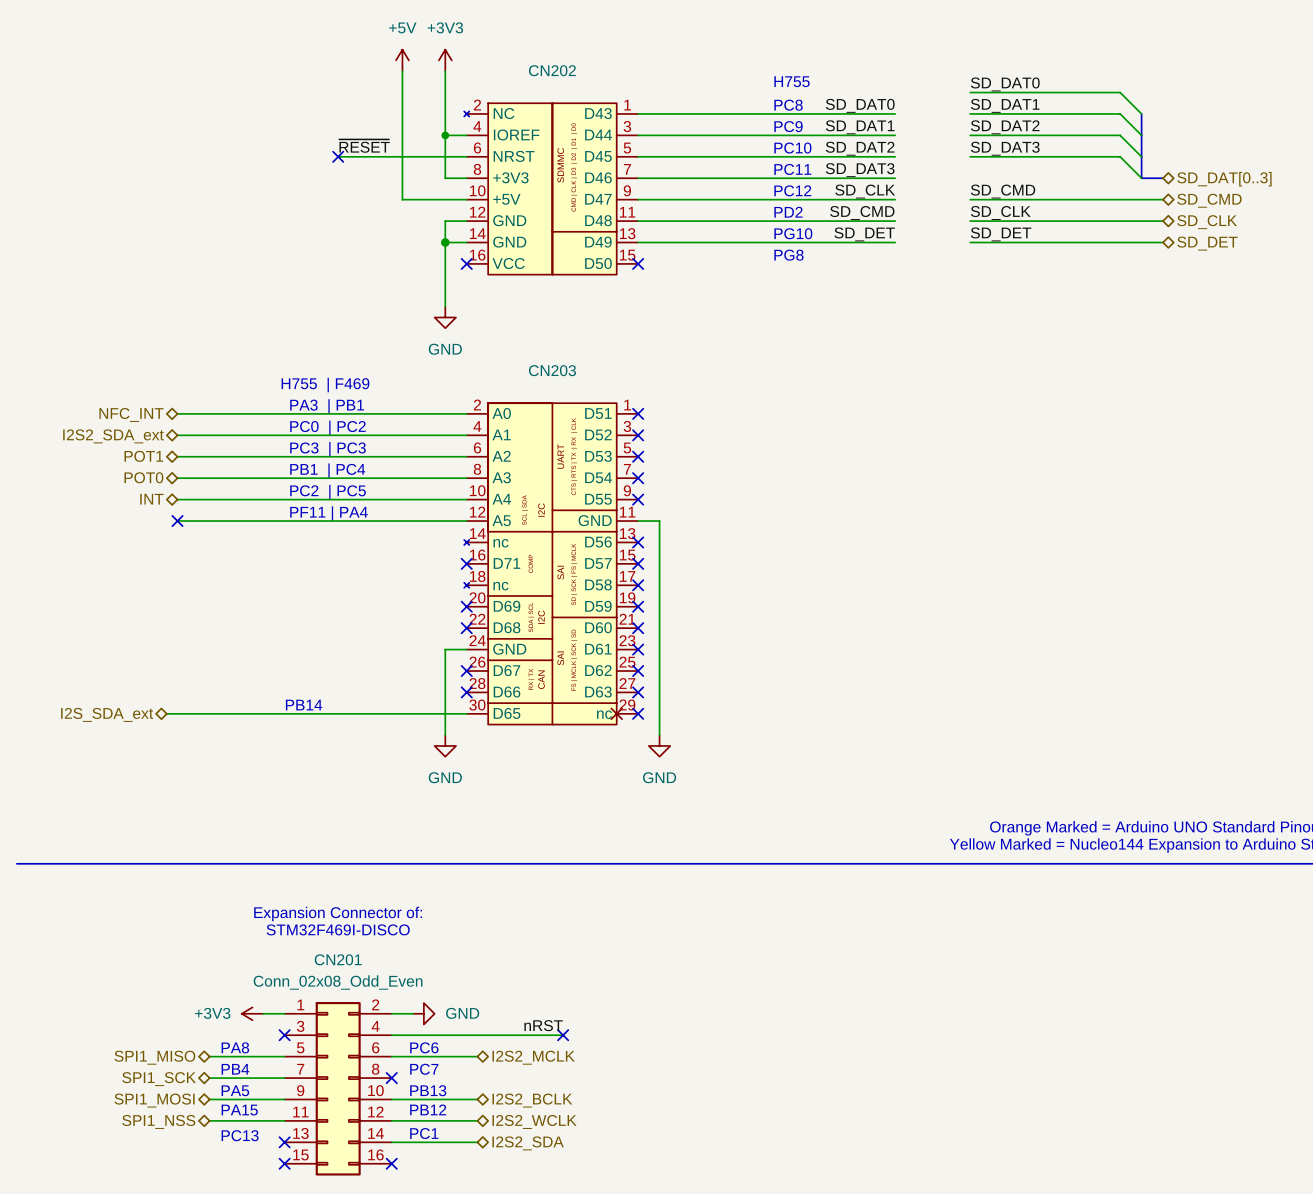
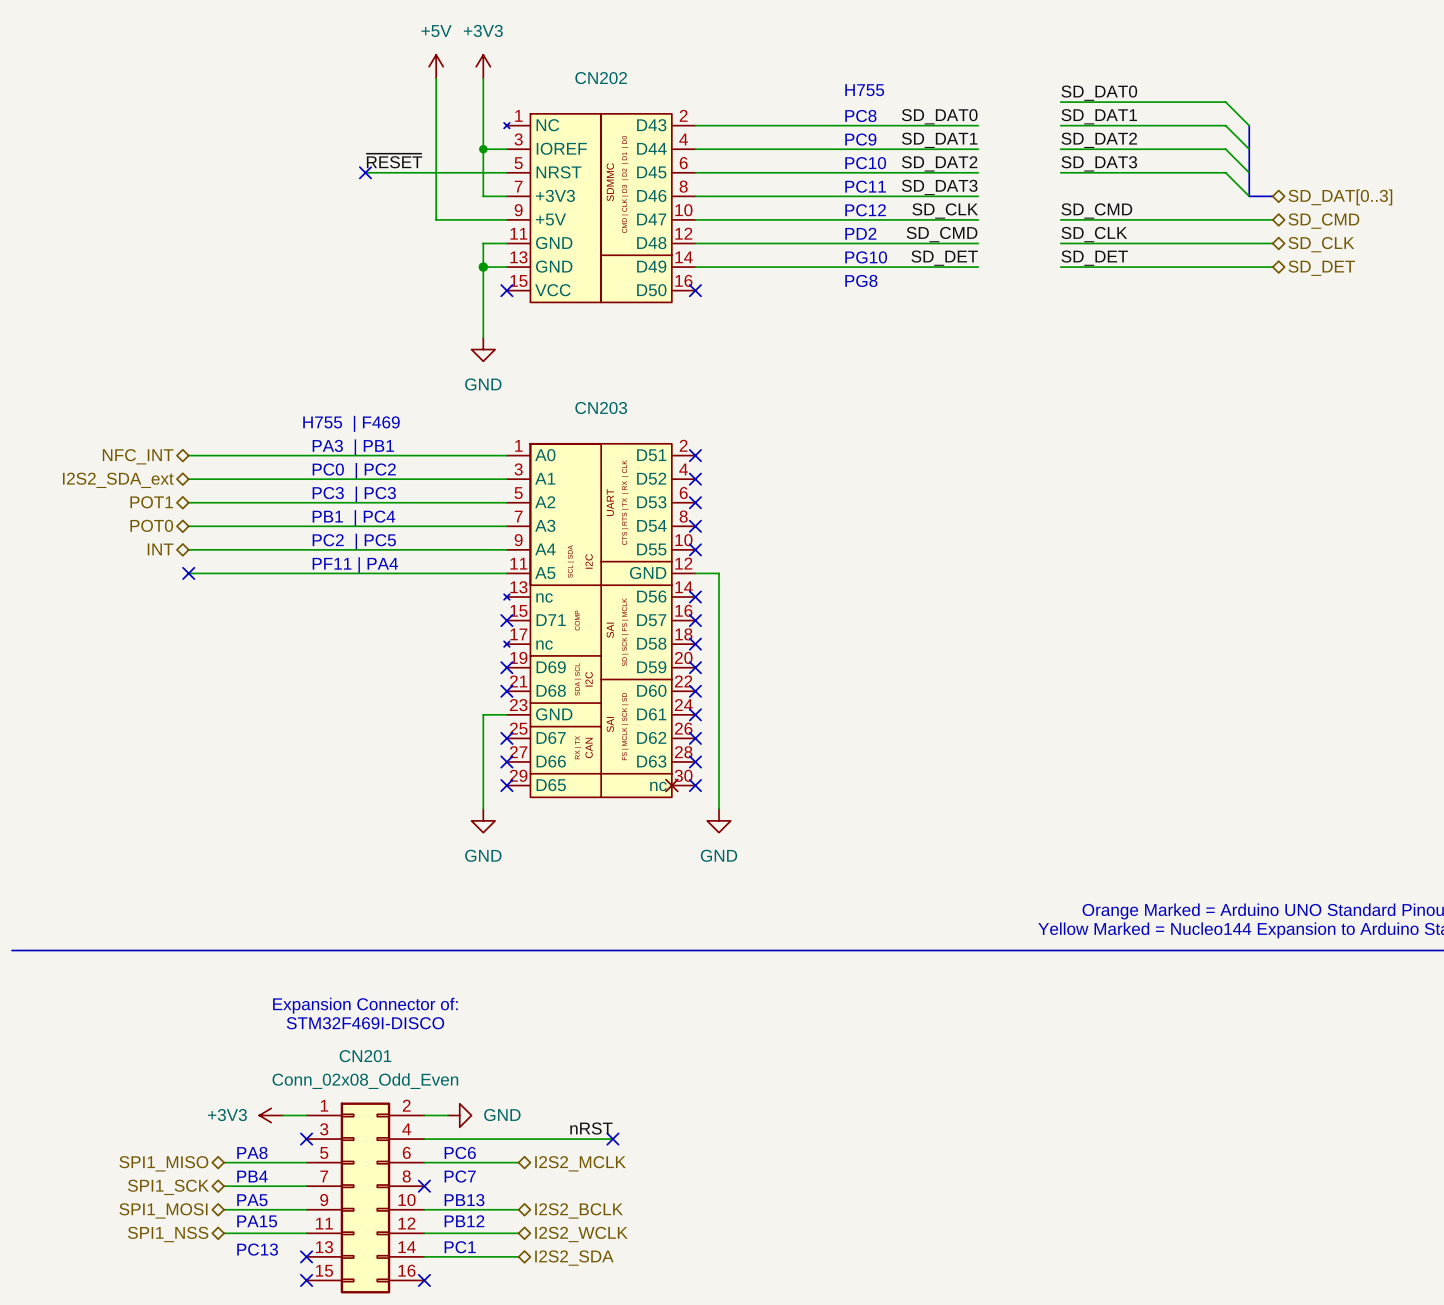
CN202 symbol: [464, 103, 639, 275] -> [504, 113, 696, 303]
CN203 symbol: [464, 403, 639, 725] -> [504, 443, 696, 798]
text: PB14 (304, 705) -> none
wire: (166, 713) (466, 713) -> none
no-connect mark: none -> (506, 785)
hierarchical label: I2S_SDA_ext (107, 714) -> none

